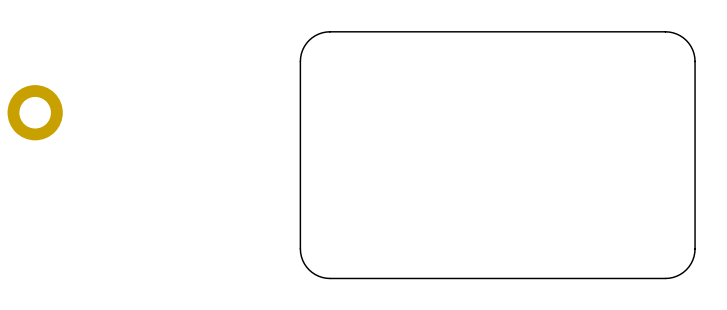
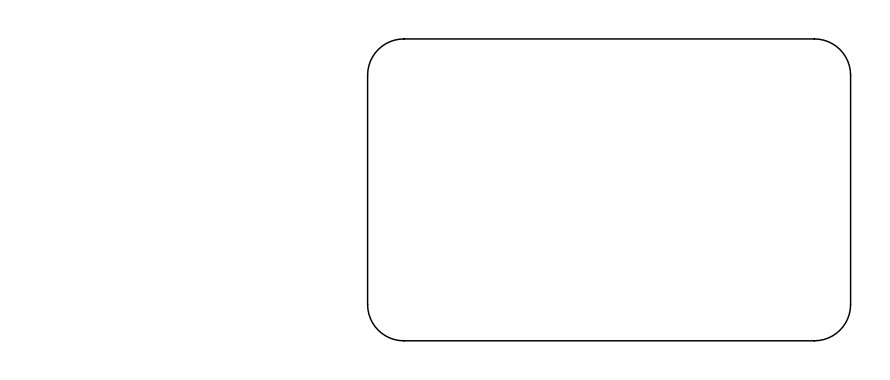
part: (35, 112) -> none

